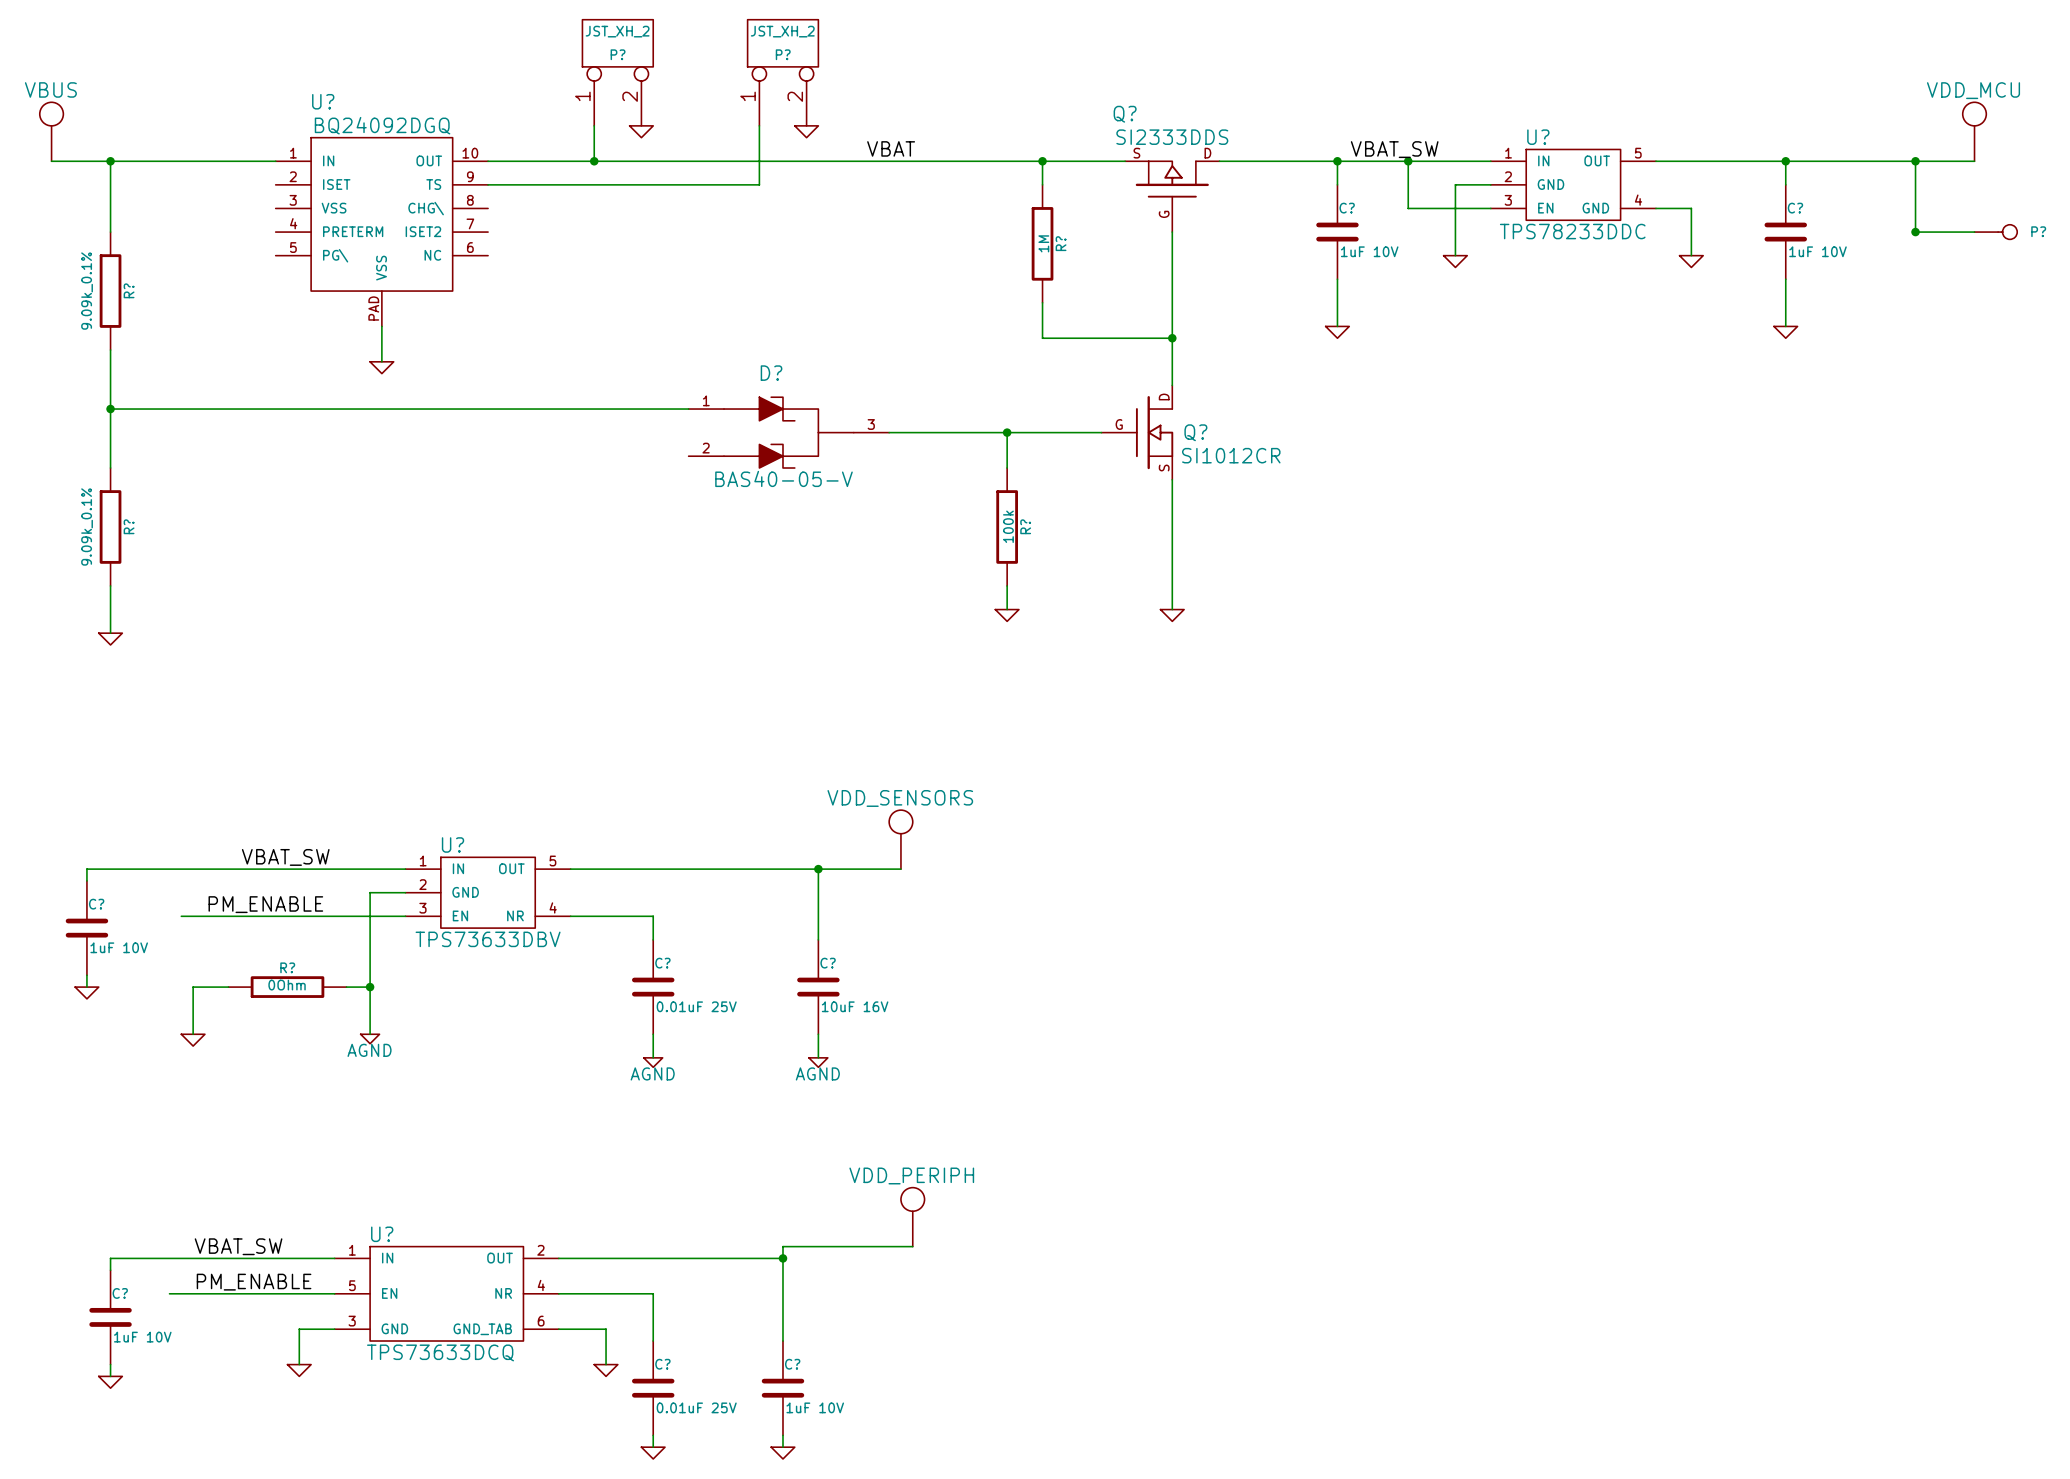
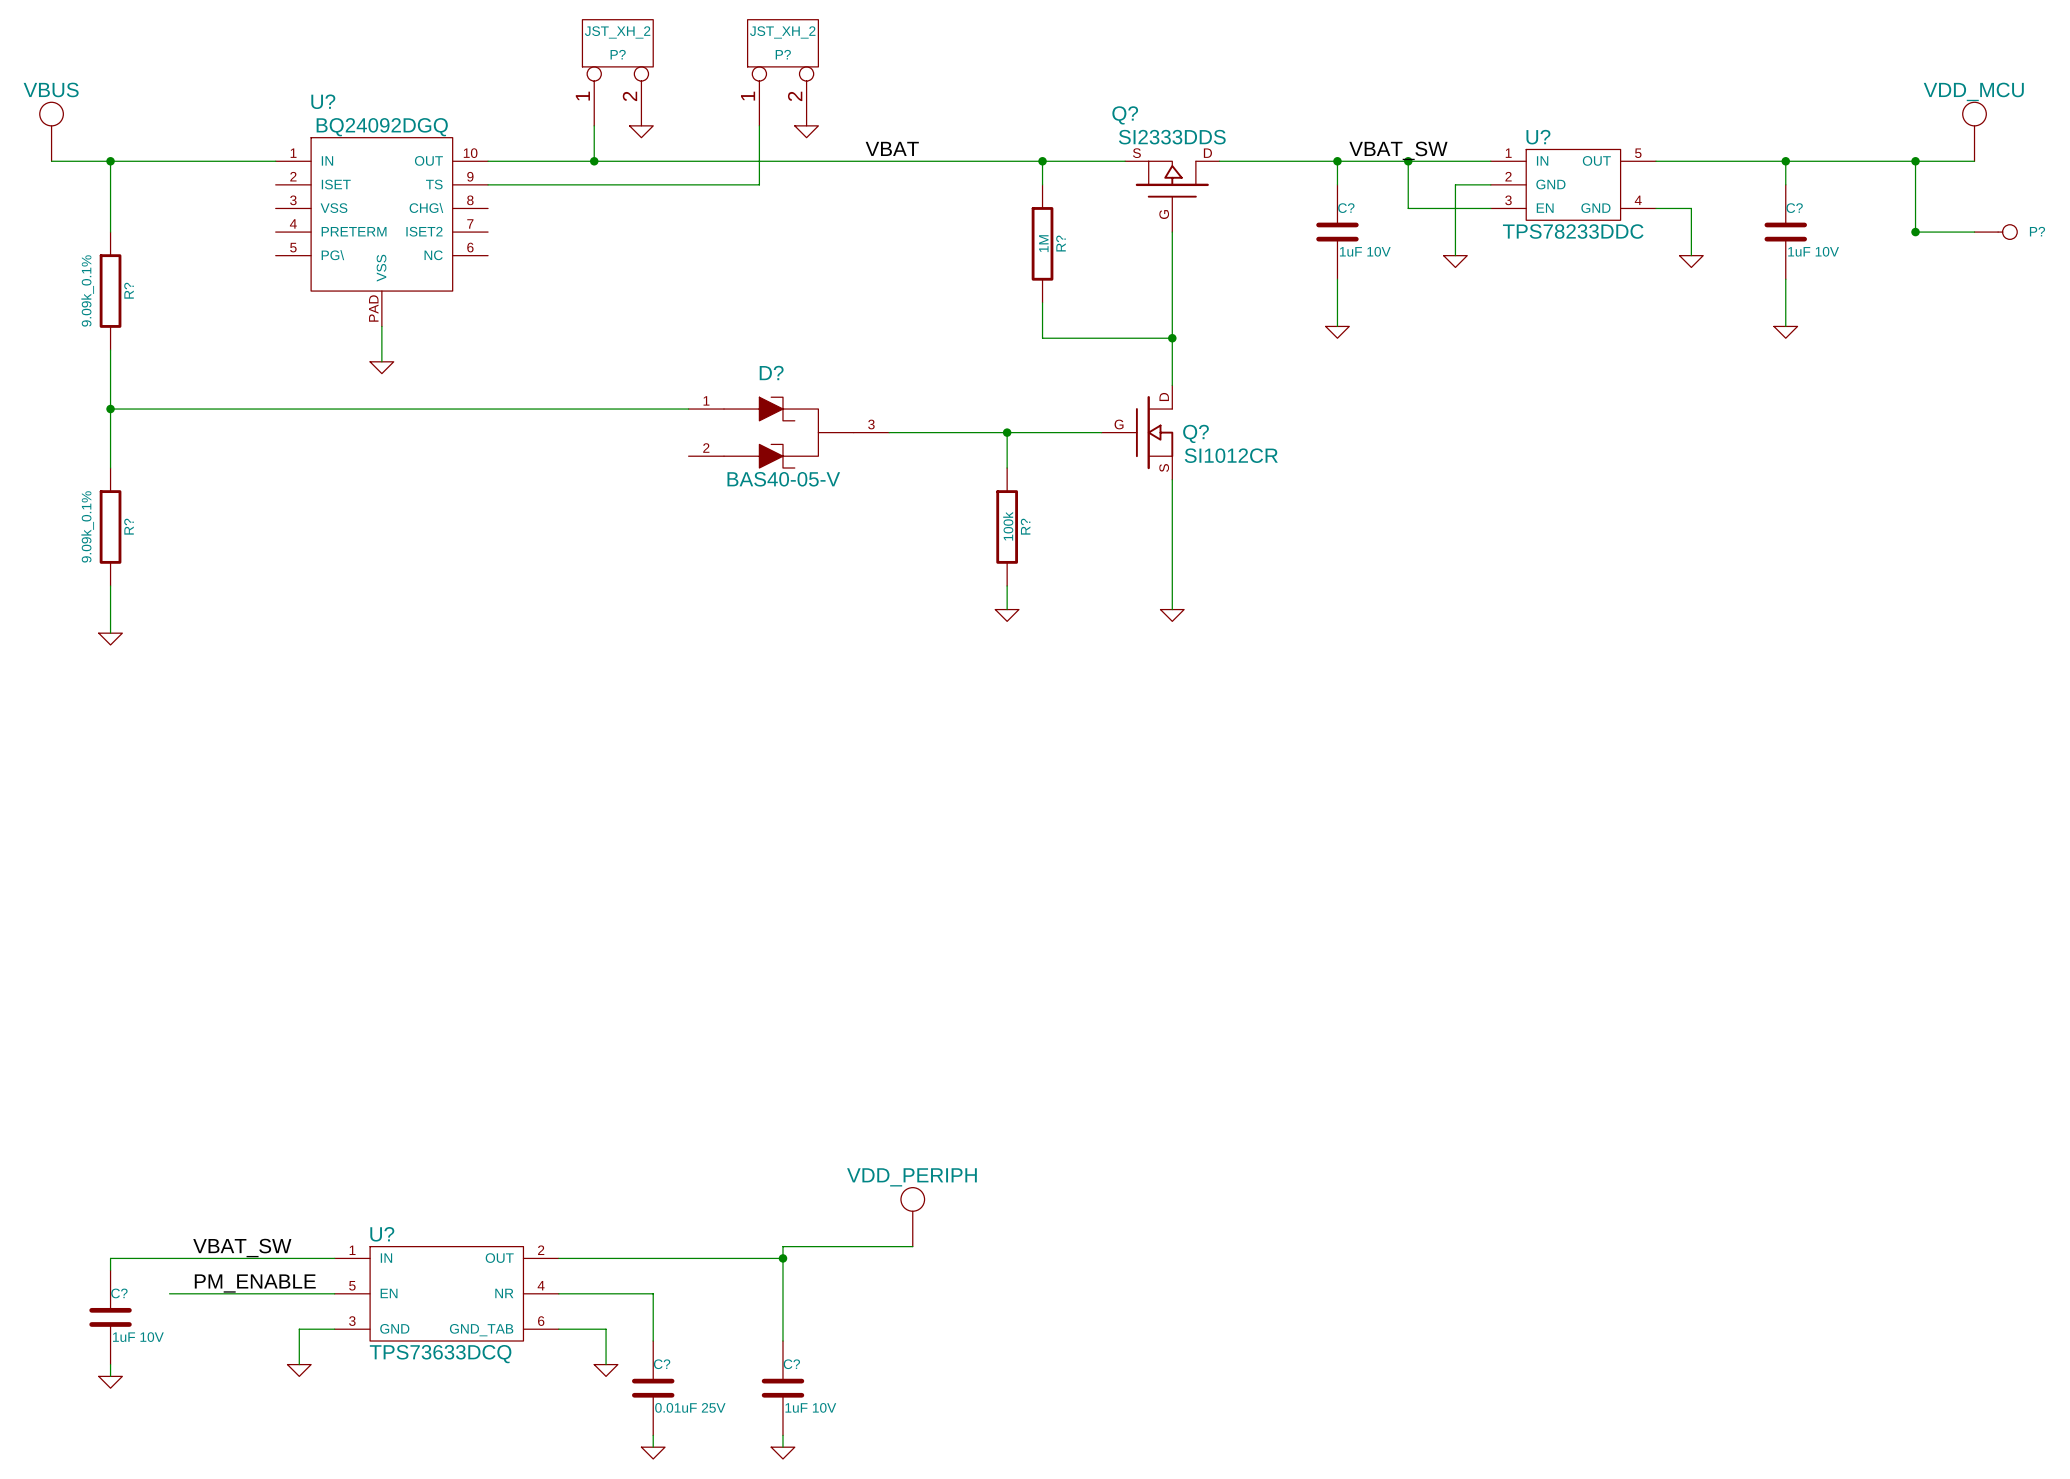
power symbol: VDD_SENSORS (900, 839) -> none
label: VBAT_SW (285, 857) -> none
wire: (405, 869) (86, 869) (86, 880) -> none
wire: (570, 869) (900, 869) -> none
wire: (818, 869) (818, 939) -> none
junction: (818, 869) -> none
wire: (405, 892) (370, 892) (370, 1034) -> none
U?: TPS73633DBV (488, 892) -> none
label: PM_ENABLE (265, 904) -> none
wire: (181, 916) (405, 916) -> none
wire: (570, 916) (653, 916) (653, 939) -> none
C?: 1uF 10V (86, 928) -> none
wire: (86, 975) (86, 987) -> none
wire: (228, 987) (193, 987) (193, 1034) -> none
R?: 0Ohm (287, 987) -> none
wire: (346, 987) (370, 987) -> none
junction: (370, 987) -> none
C?: 0.01uF 25V (653, 987) -> none
C?: 10uF 16V (818, 987) -> none
power symbol: (86, 992) -> none
wire: (653, 1034) (653, 1057) -> none
wire: (818, 1034) (818, 1057) -> none
power symbol: AGND (370, 1038) -> none
power symbol: (193, 1040) -> none
power symbol: AGND (653, 1062) -> none
power symbol: AGND (818, 1062) -> none

